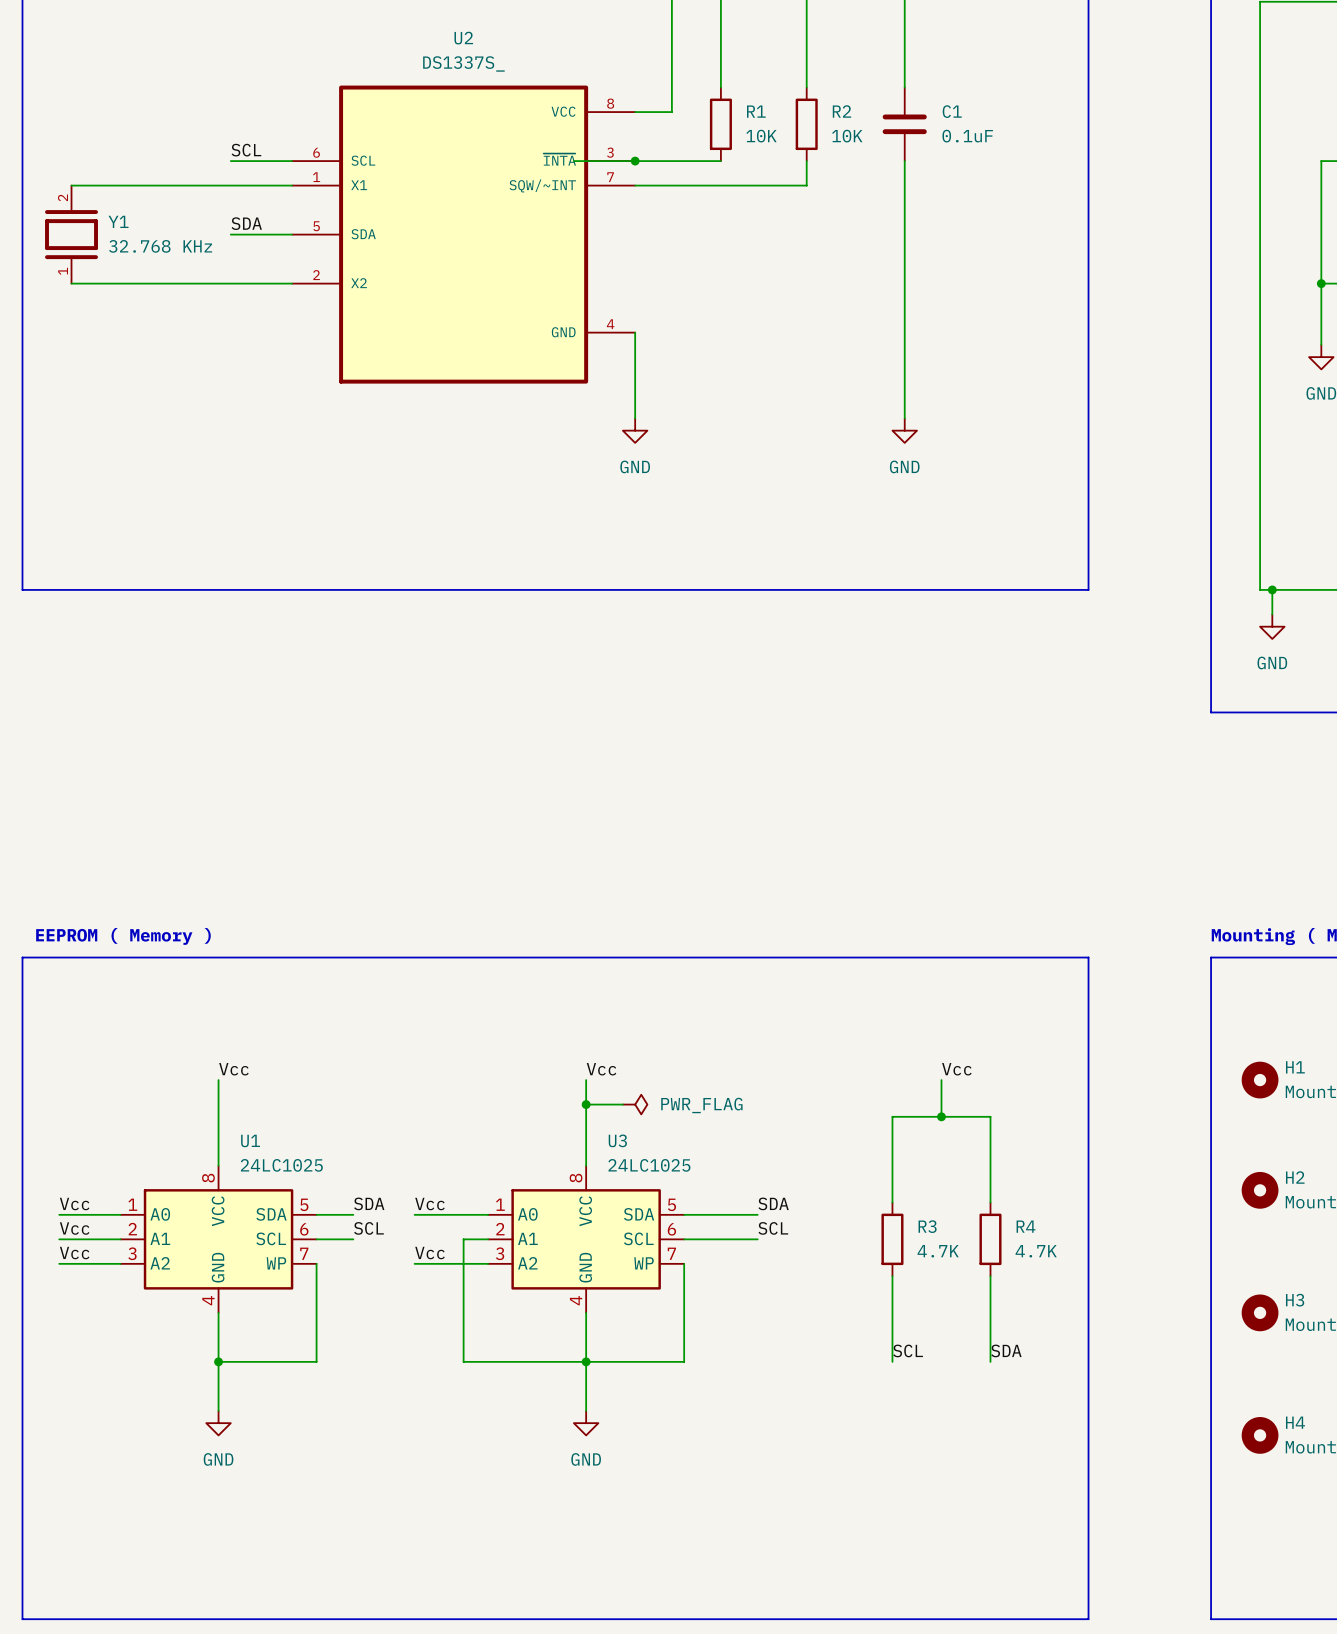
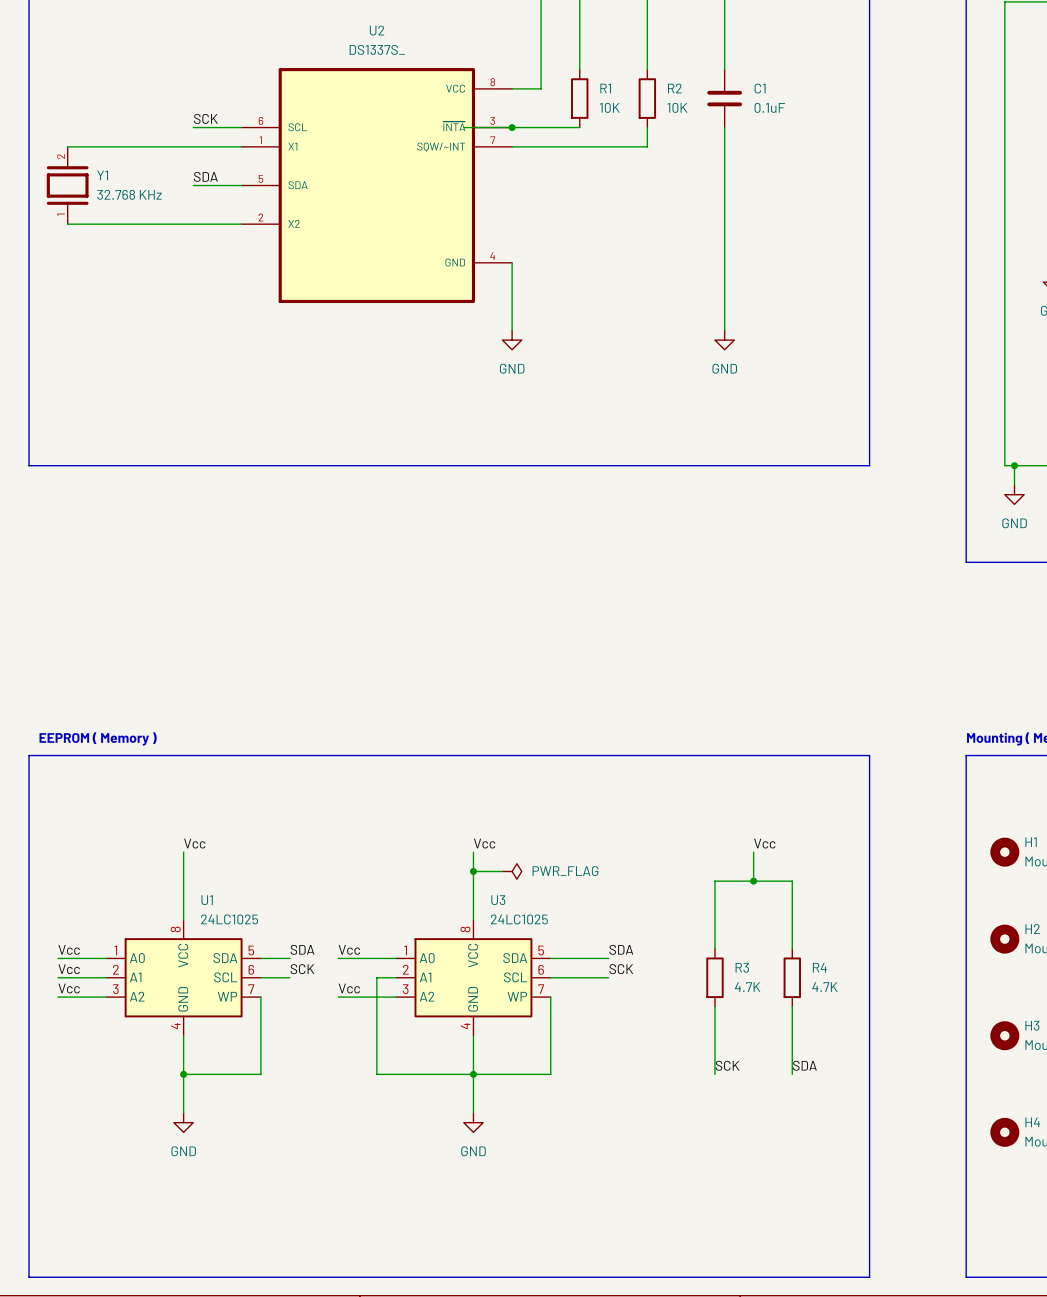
label: SCL (246, 150) -> SCK (205, 118)
label: SCL (368, 1228) -> SCK (302, 969)
label: SCL (773, 1228) -> SCK (621, 969)
label: SCL (908, 1350) -> SCK (727, 1065)

